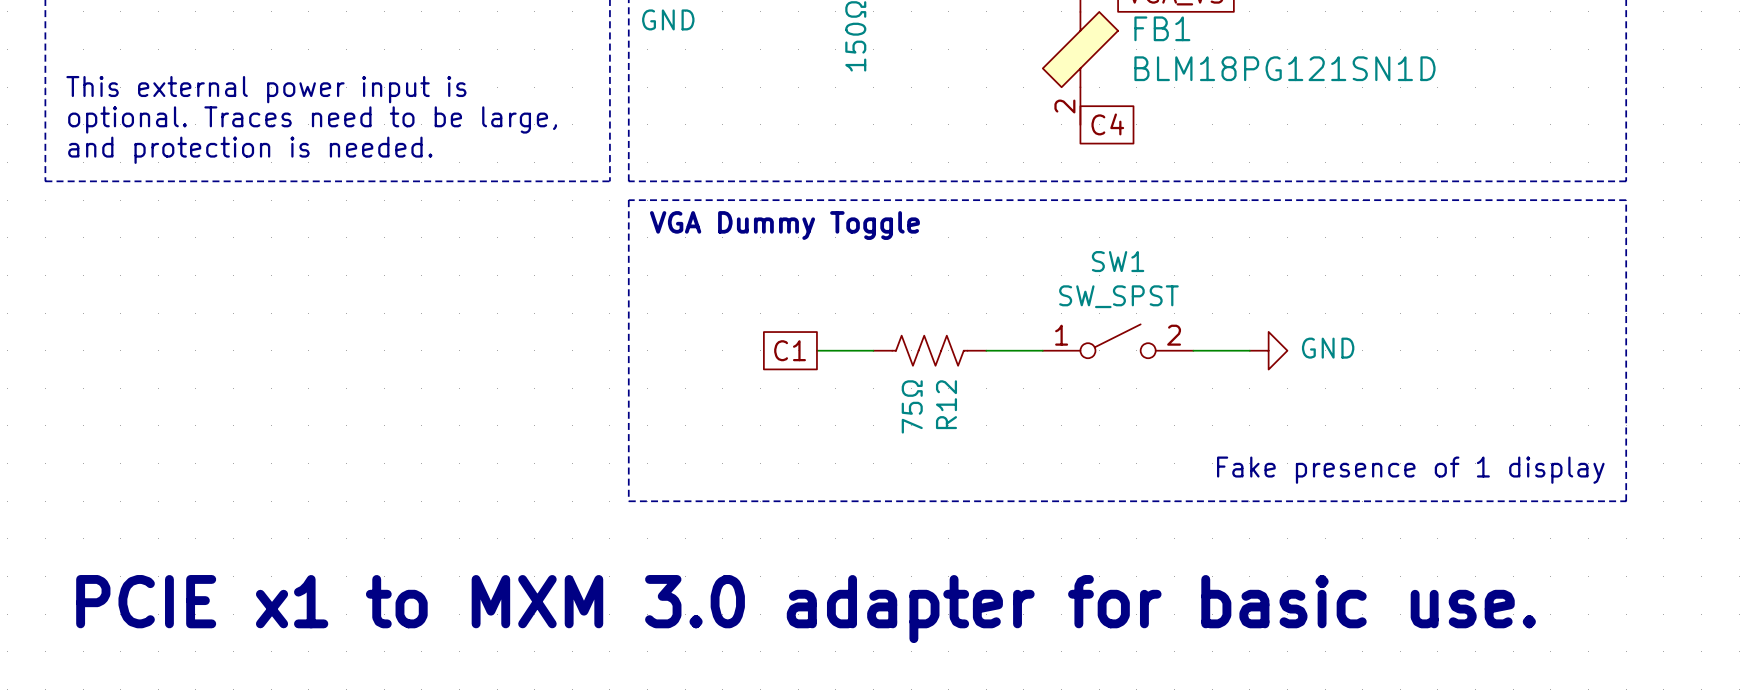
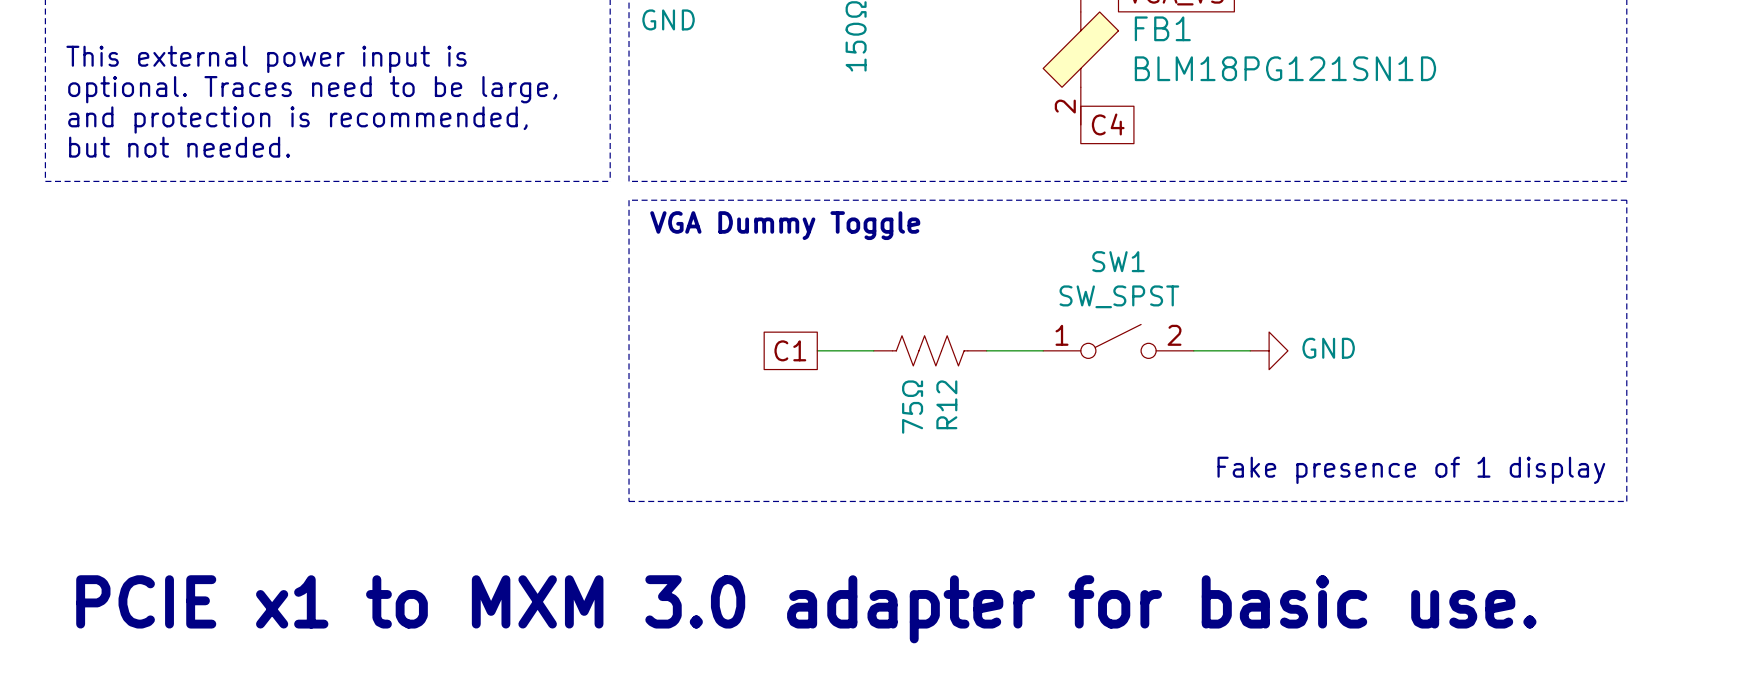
text: none -> This external power input is (266, 59)
text: This external power input is (266, 89) -> optional. Traces need to be large, (312, 89)
text: optional. Traces need to be large, (312, 119) -> and protection is recommended, (297, 119)
text: and protection is needed. (250, 150) -> but not needed. (179, 147)

